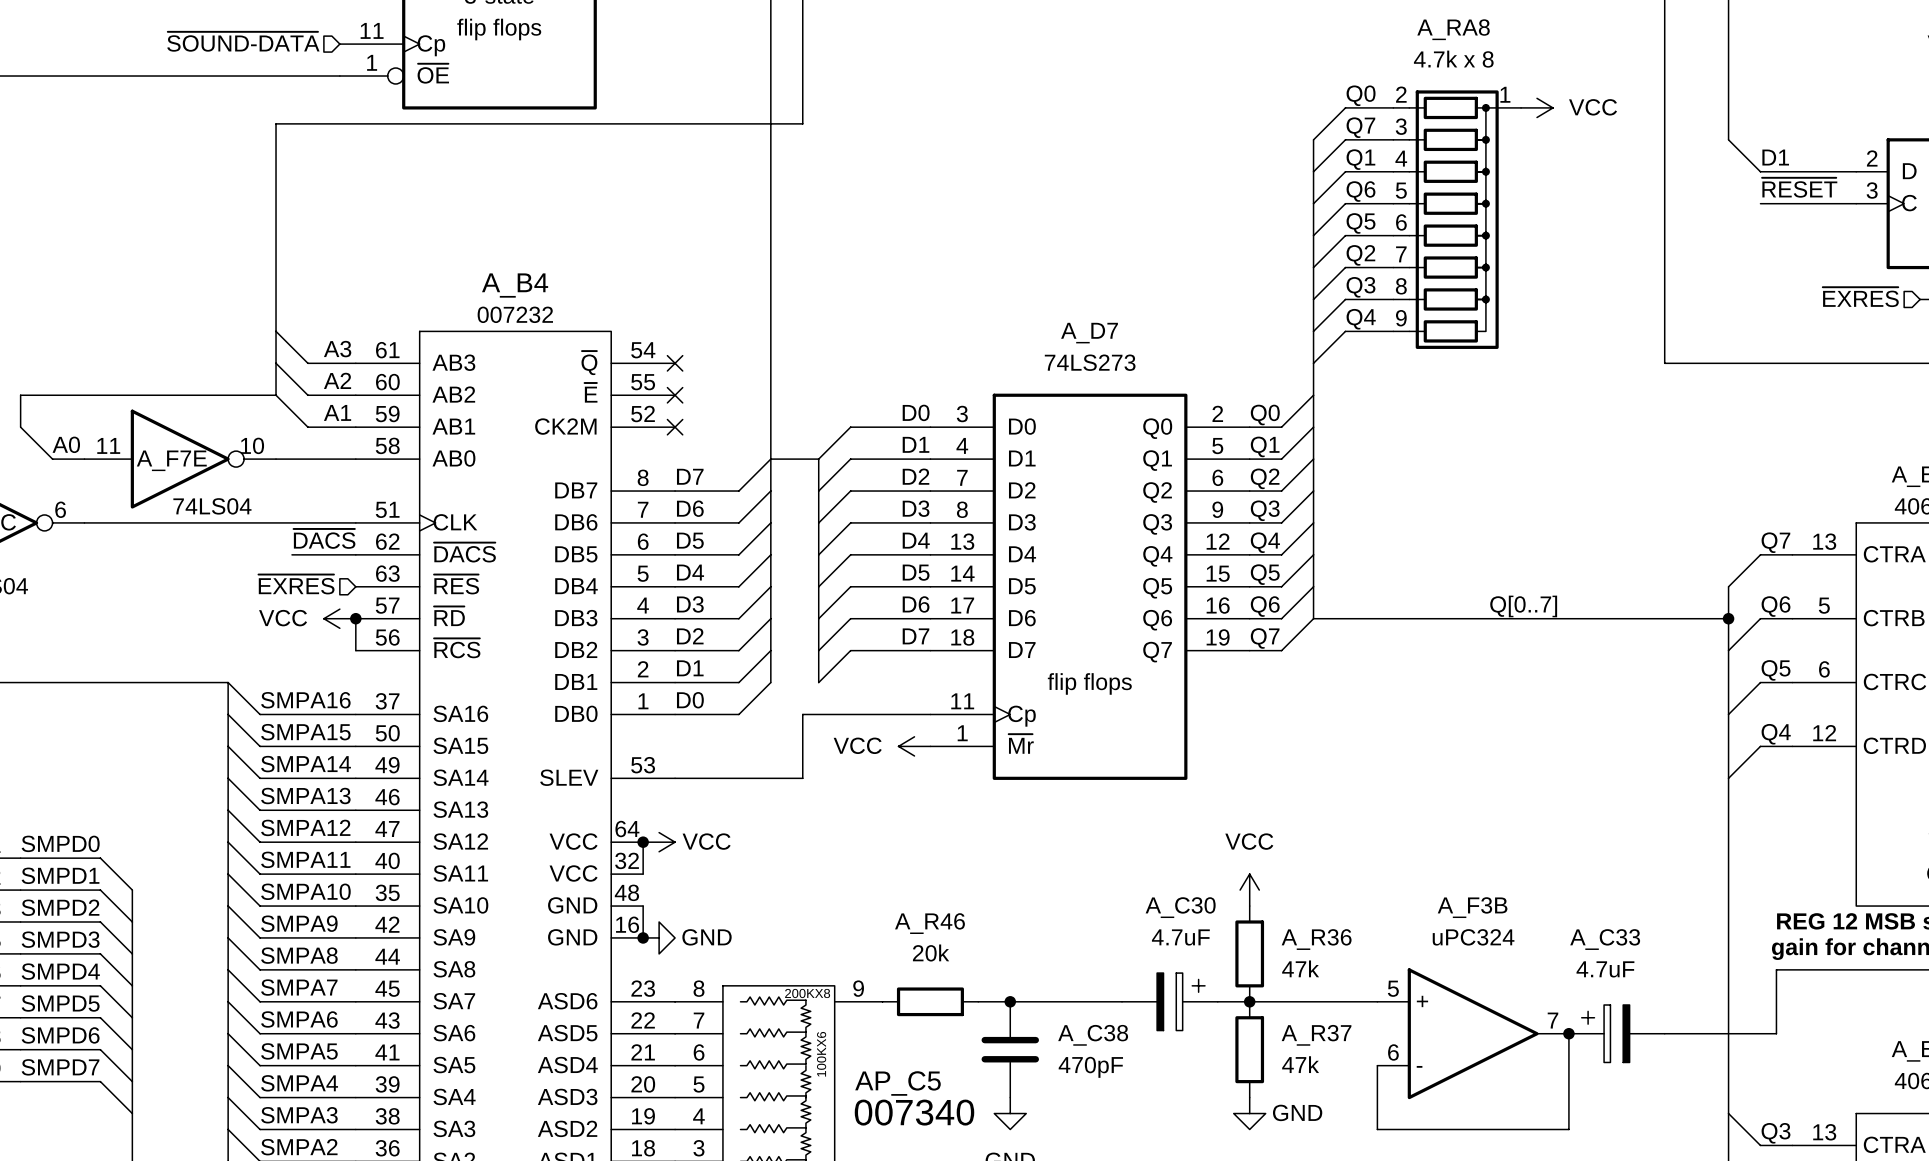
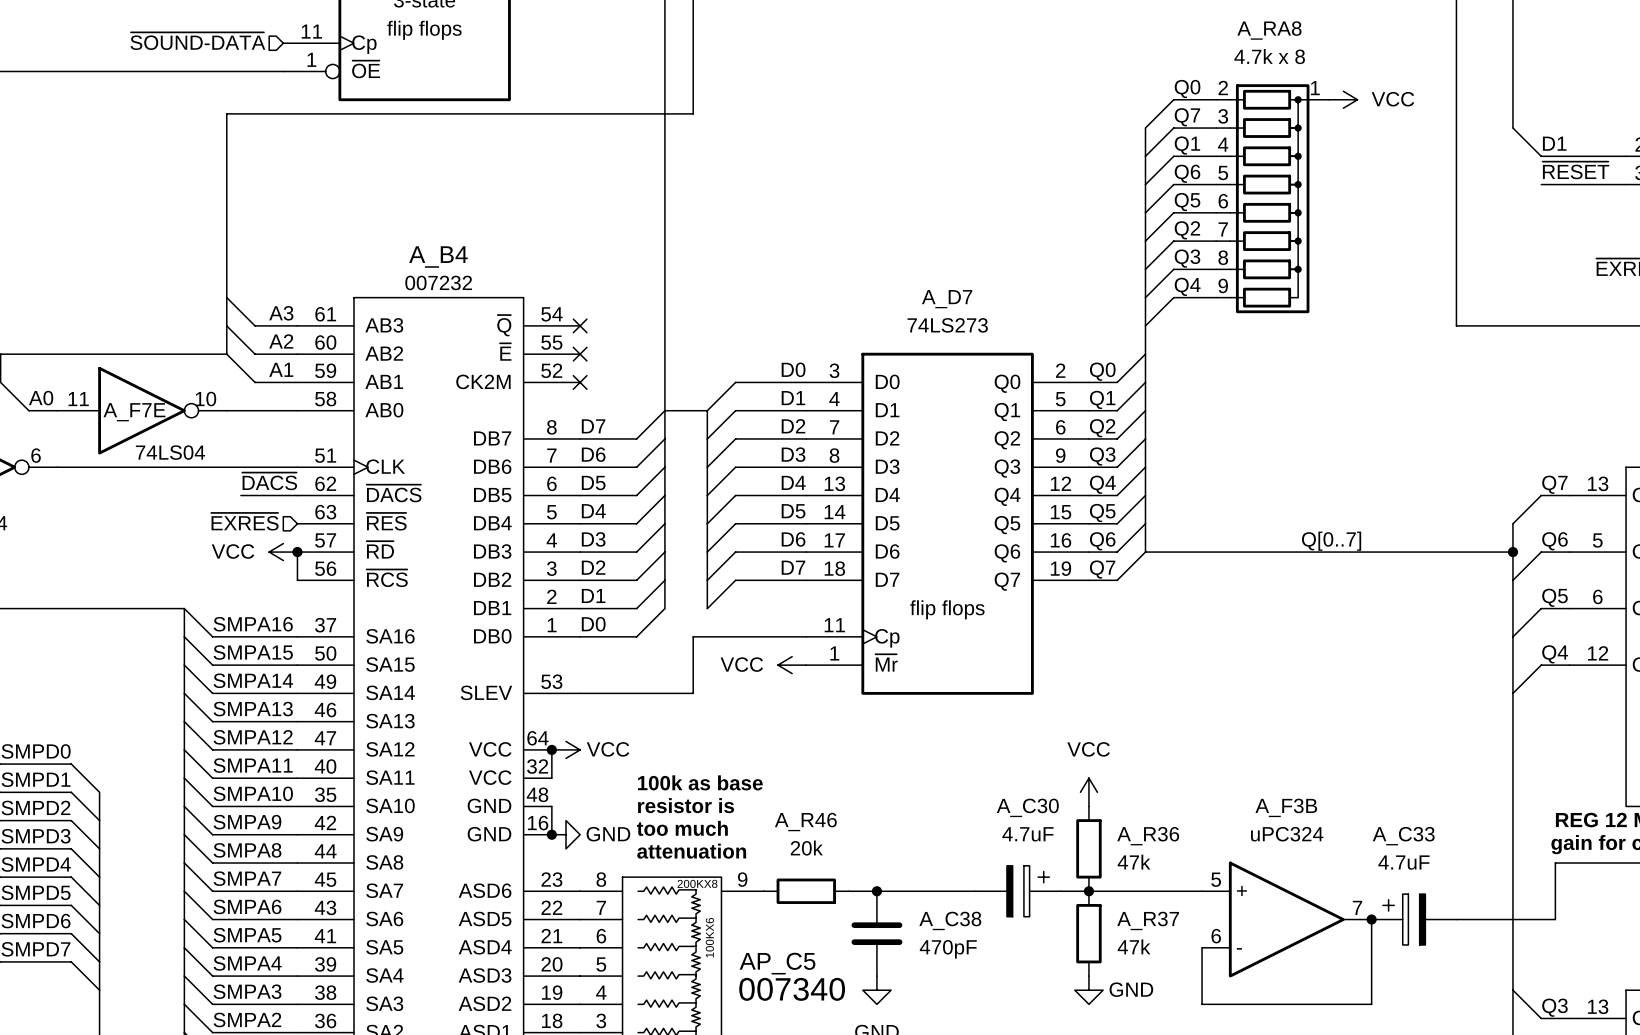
text: none -> 100k as base (700, 782)
text: none -> resistor is (686, 805)
text: none -> too much (682, 828)
text: none -> attenuation (691, 851)

